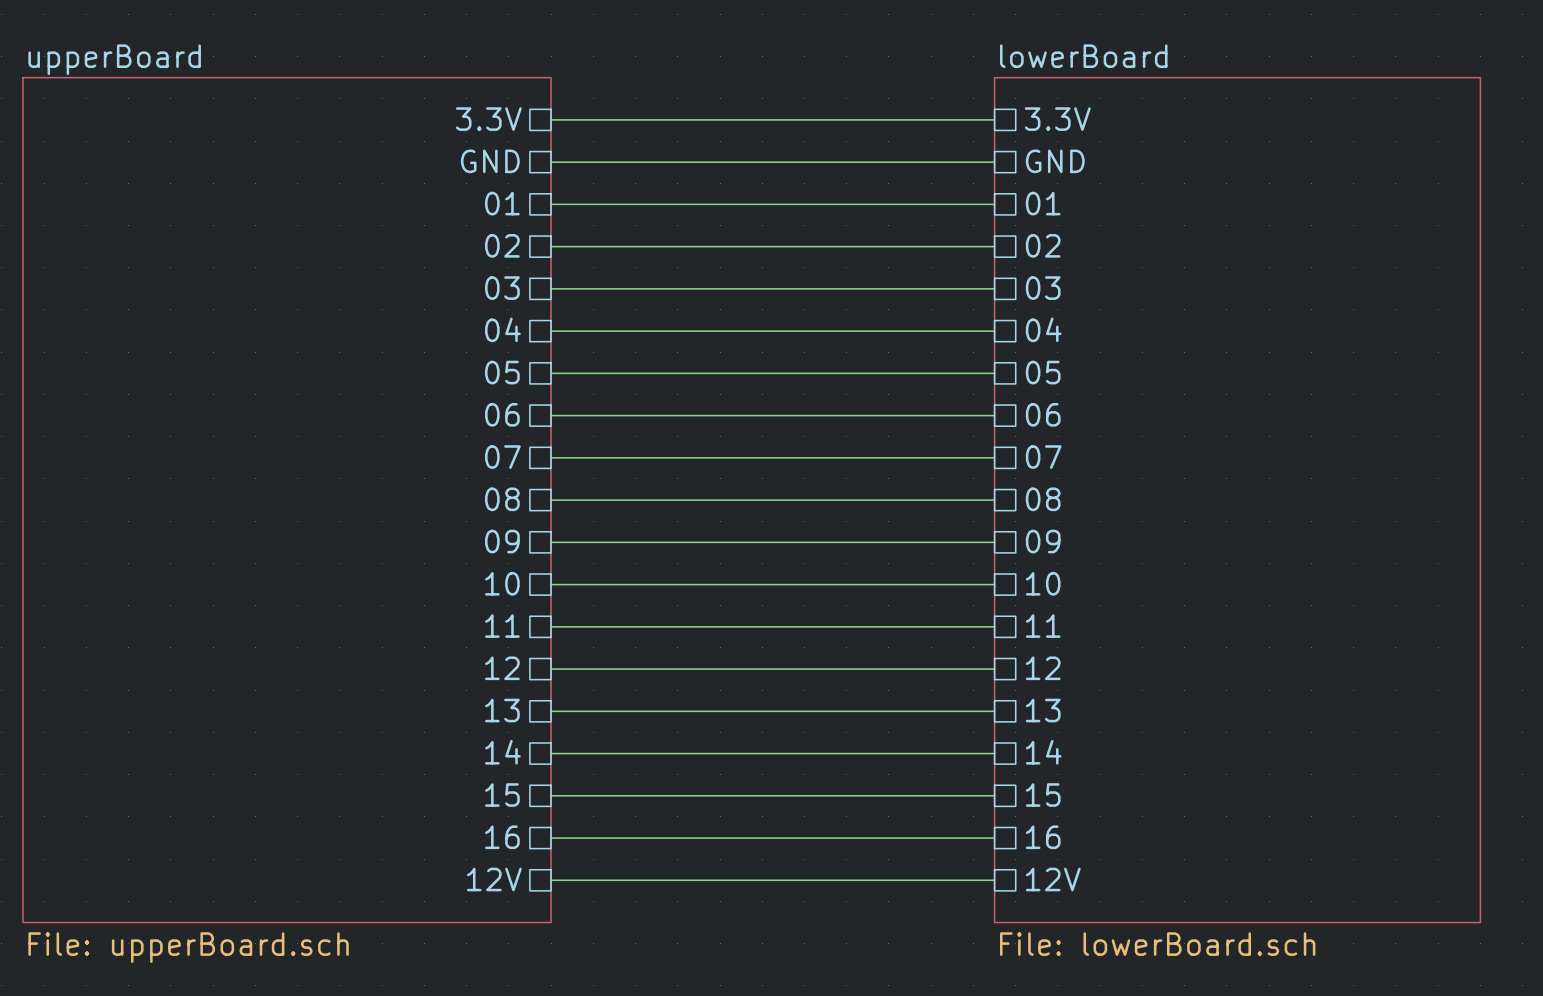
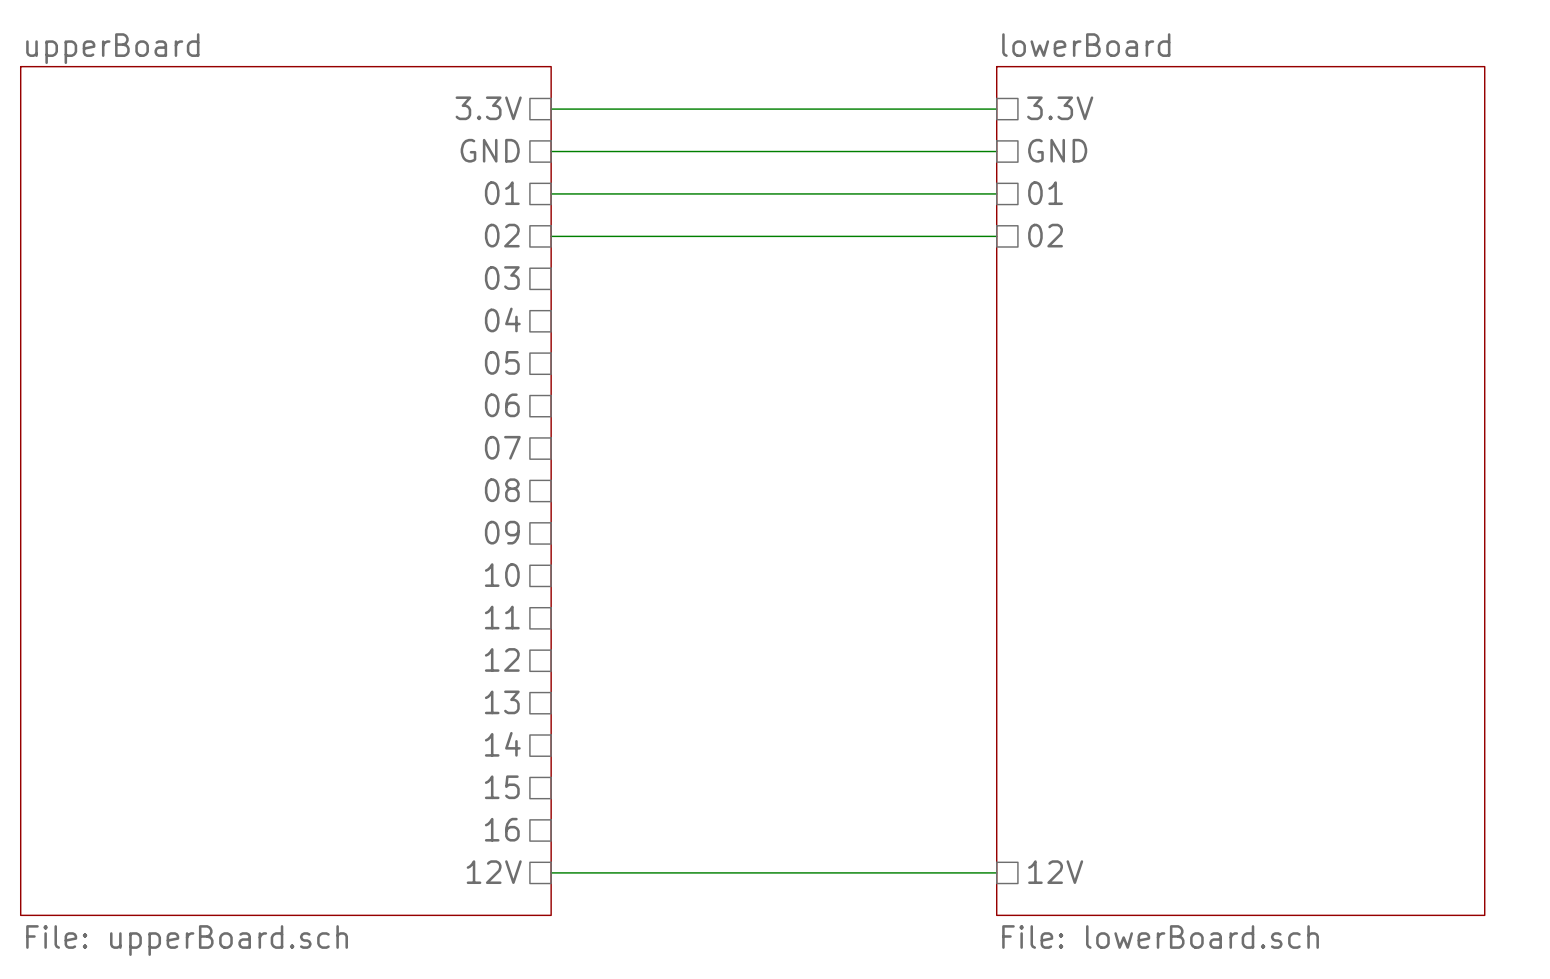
wire: (551, 288) (994, 288) -> none
sheet pin: 03 (1043, 288) -> none
sheet pin: 04 (1043, 329) -> none
wire: (551, 331) (994, 331) -> none
sheet pin: 05 (1043, 372) -> none
wire: (551, 373) (994, 373) -> none
sheet pin: 06 (1043, 414) -> none
wire: (551, 415) (994, 415) -> none
wire: (551, 457) (994, 457) -> none
sheet pin: 07 (1043, 457) -> none
sheet pin: 08 (1043, 499) -> none
wire: (551, 500) (994, 500) -> none
sheet pin: 09 (1043, 541) -> none
wire: (551, 542) (994, 542) -> none
sheet pin: 10 (1043, 583) -> none
wire: (551, 584) (994, 584) -> none
wire: (551, 626) (994, 626) -> none
sheet pin: 11 (1043, 626) -> none
sheet pin: 12 (1043, 668) -> none
wire: (551, 669) (994, 669) -> none
sheet pin: 13 (1043, 710) -> none
wire: (551, 711) (994, 711) -> none
sheet pin: 14 (1043, 752) -> none
wire: (551, 753) (994, 753) -> none
wire: (551, 795) (994, 795) -> none
sheet pin: 15 (1043, 795) -> none
sheet pin: 16 (1043, 837) -> none
wire: (551, 838) (994, 838) -> none

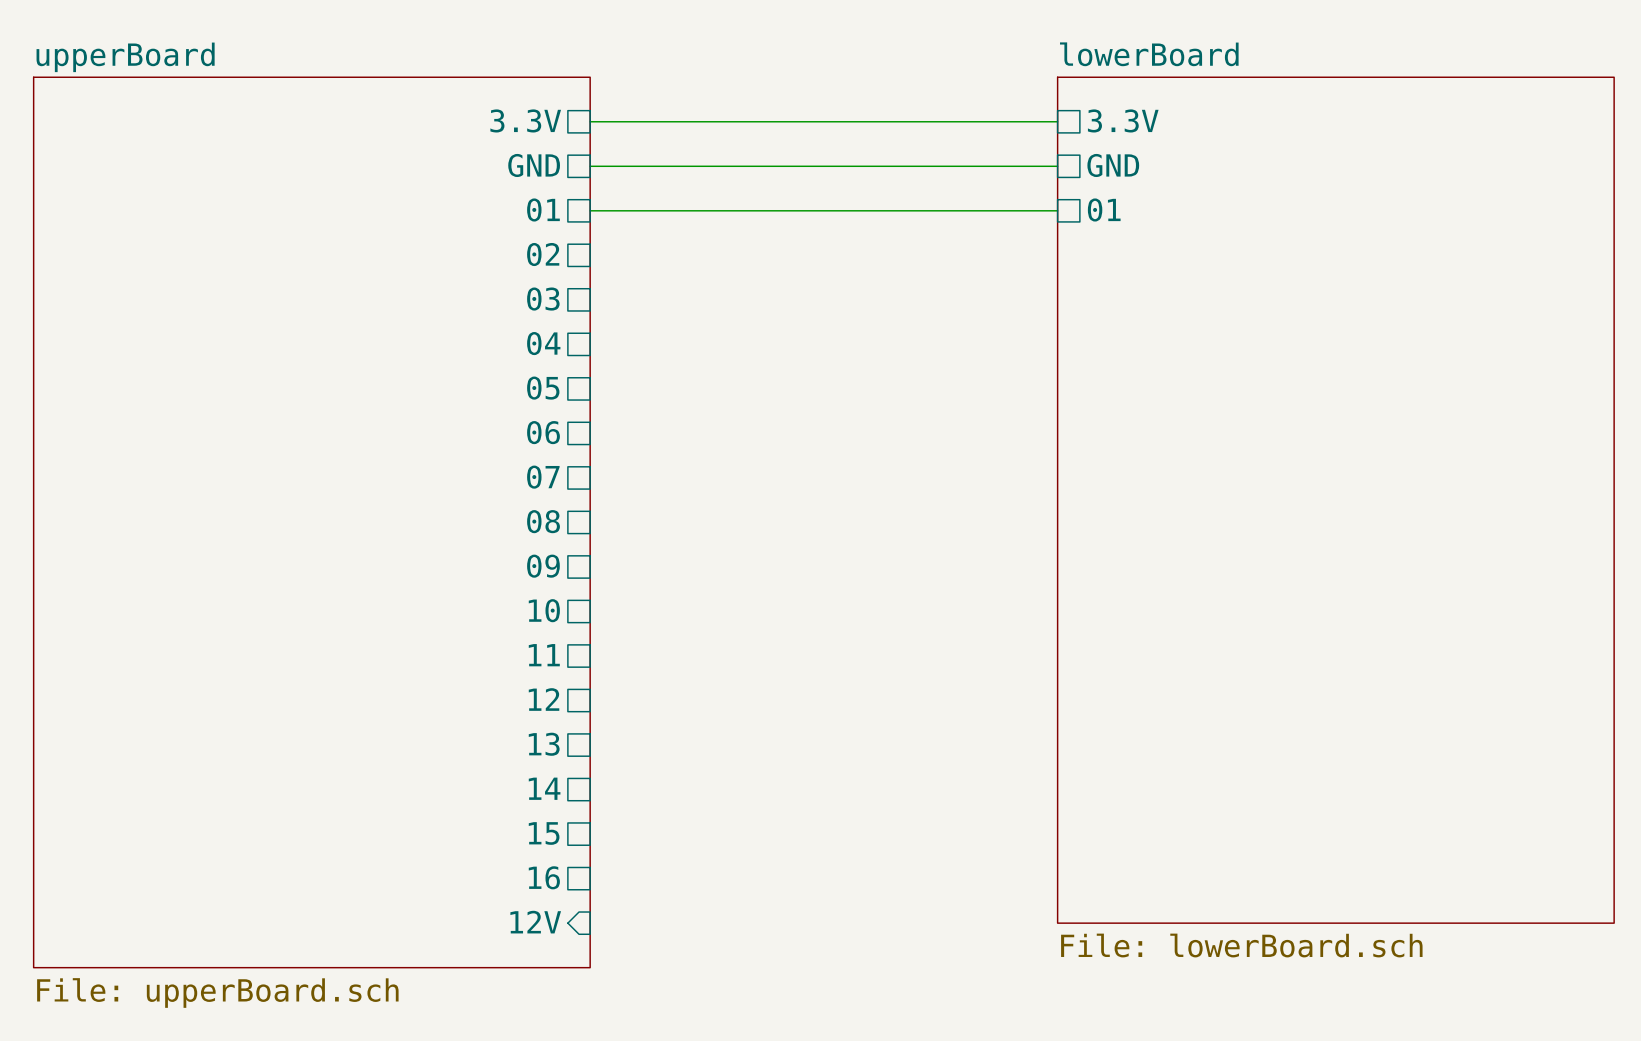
sheet pin: 02 (1045, 235) -> none
wire: (551, 236) (996, 236) -> none
sheet lowerBoard: none -> File: lowerBoard.sch (1335, 500)
sheet lowerBoard: File: lowerBoard.sch (1240, 491) -> none
sheet pin shape: passive (494, 872) -> input (535, 922)
wire: (551, 872) (996, 872) -> none
sheet pin: 12V (1055, 872) -> none

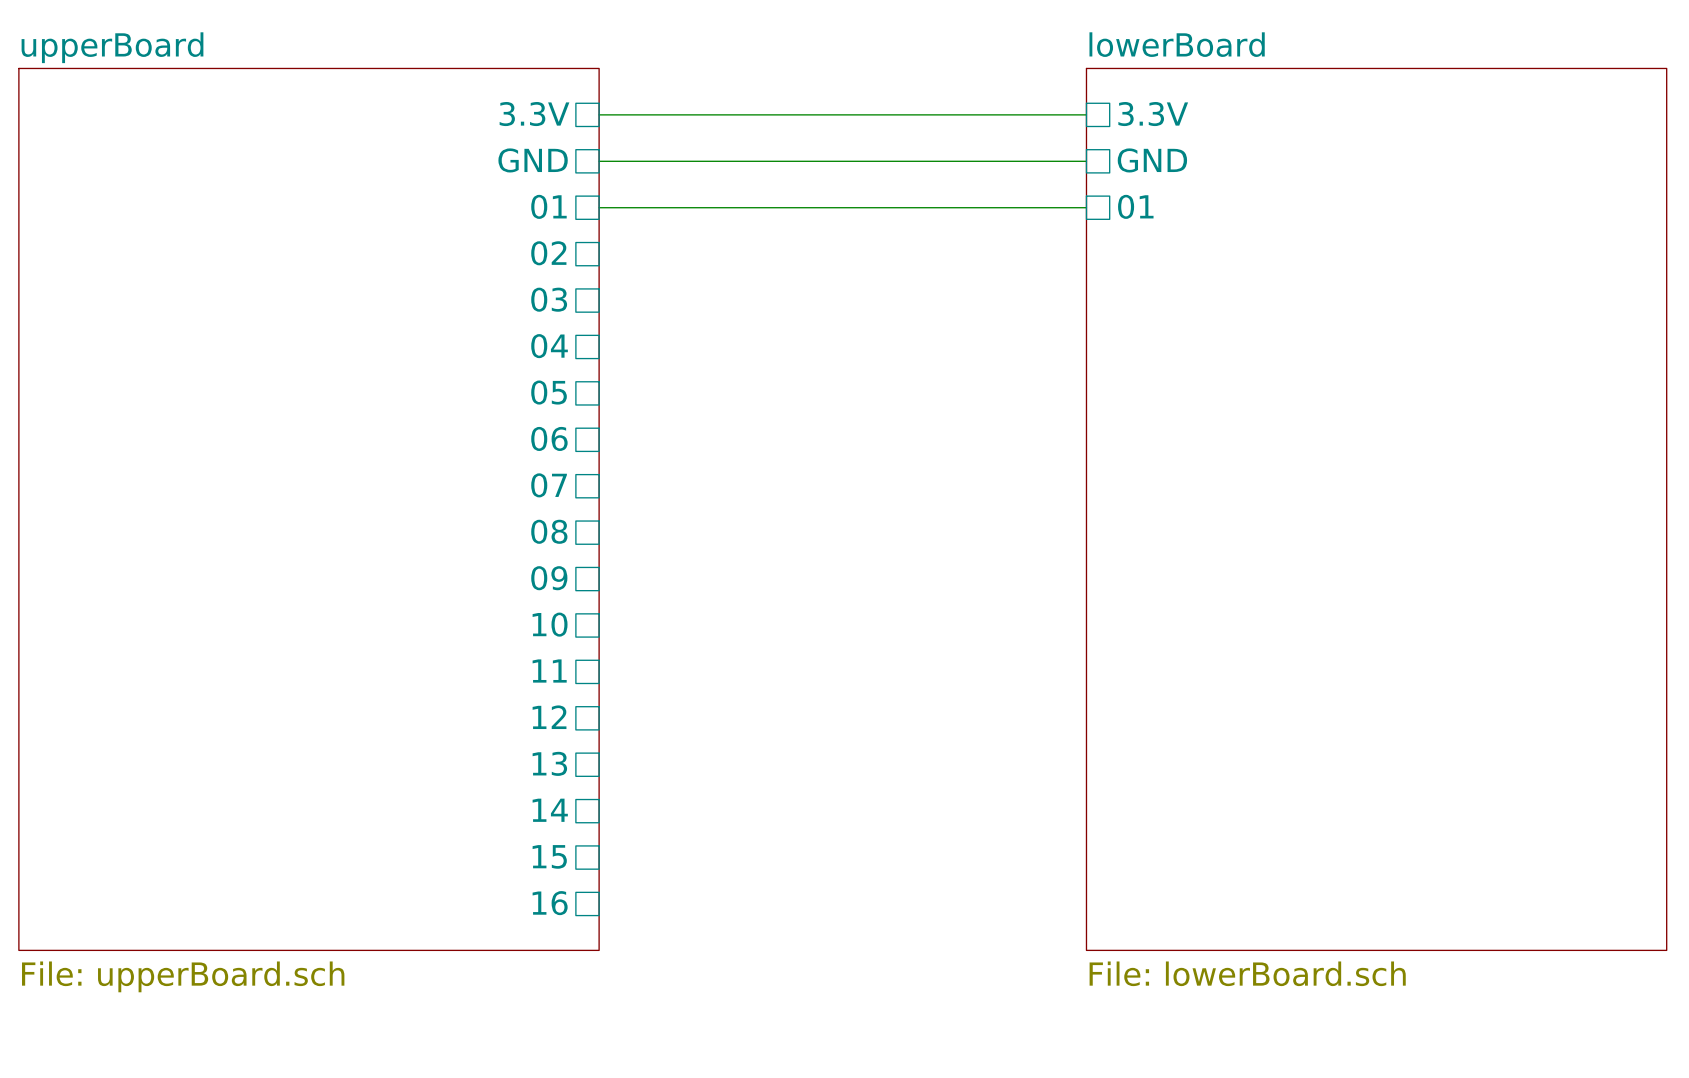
sheet upperBoard: none -> File: upperBoard.sch (309, 509)
sheet upperBoard: File: upperBoard.sch (311, 522) -> none
sheet pin: 12V (535, 922) -> none

